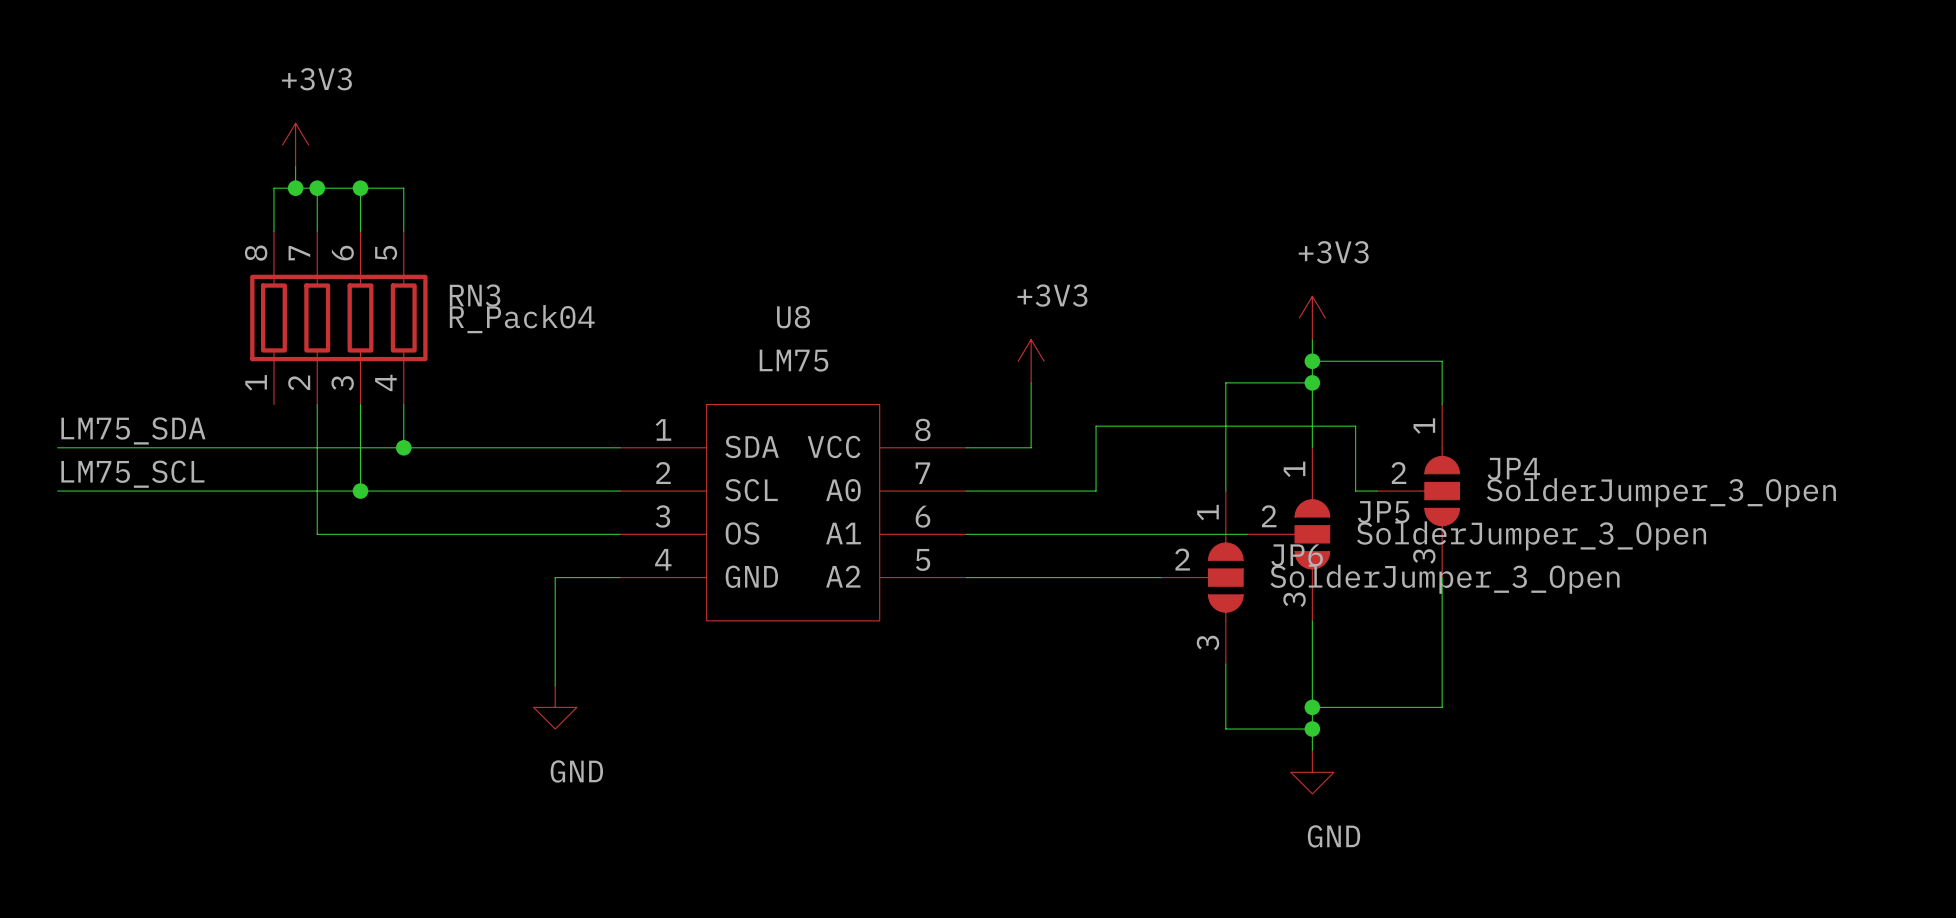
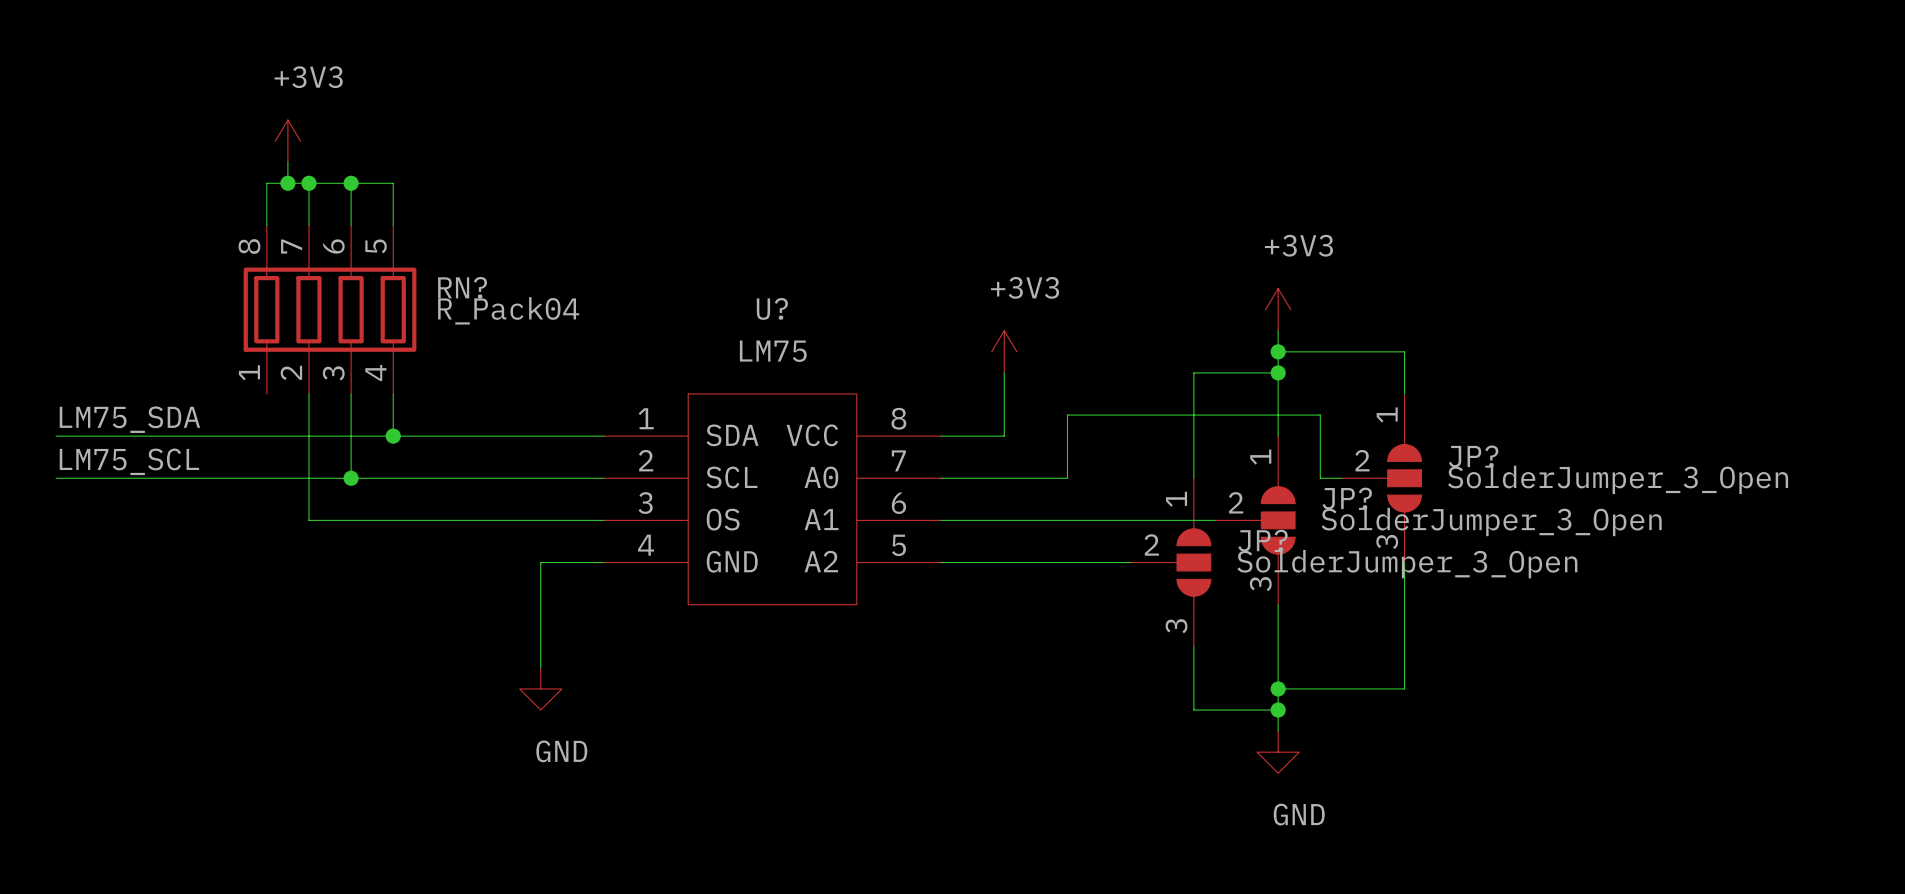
RN3 name: RN3 (475, 295) -> RN? (462, 287)
U8 name: U8 (793, 317) -> U? (772, 308)
JP4 name: JP4 (1513, 468) -> JP? (1473, 456)
JP5 name: JP5 (1383, 512) -> JP? (1347, 498)
JP6 name: JP6 (1297, 555) -> JP? (1262, 540)

